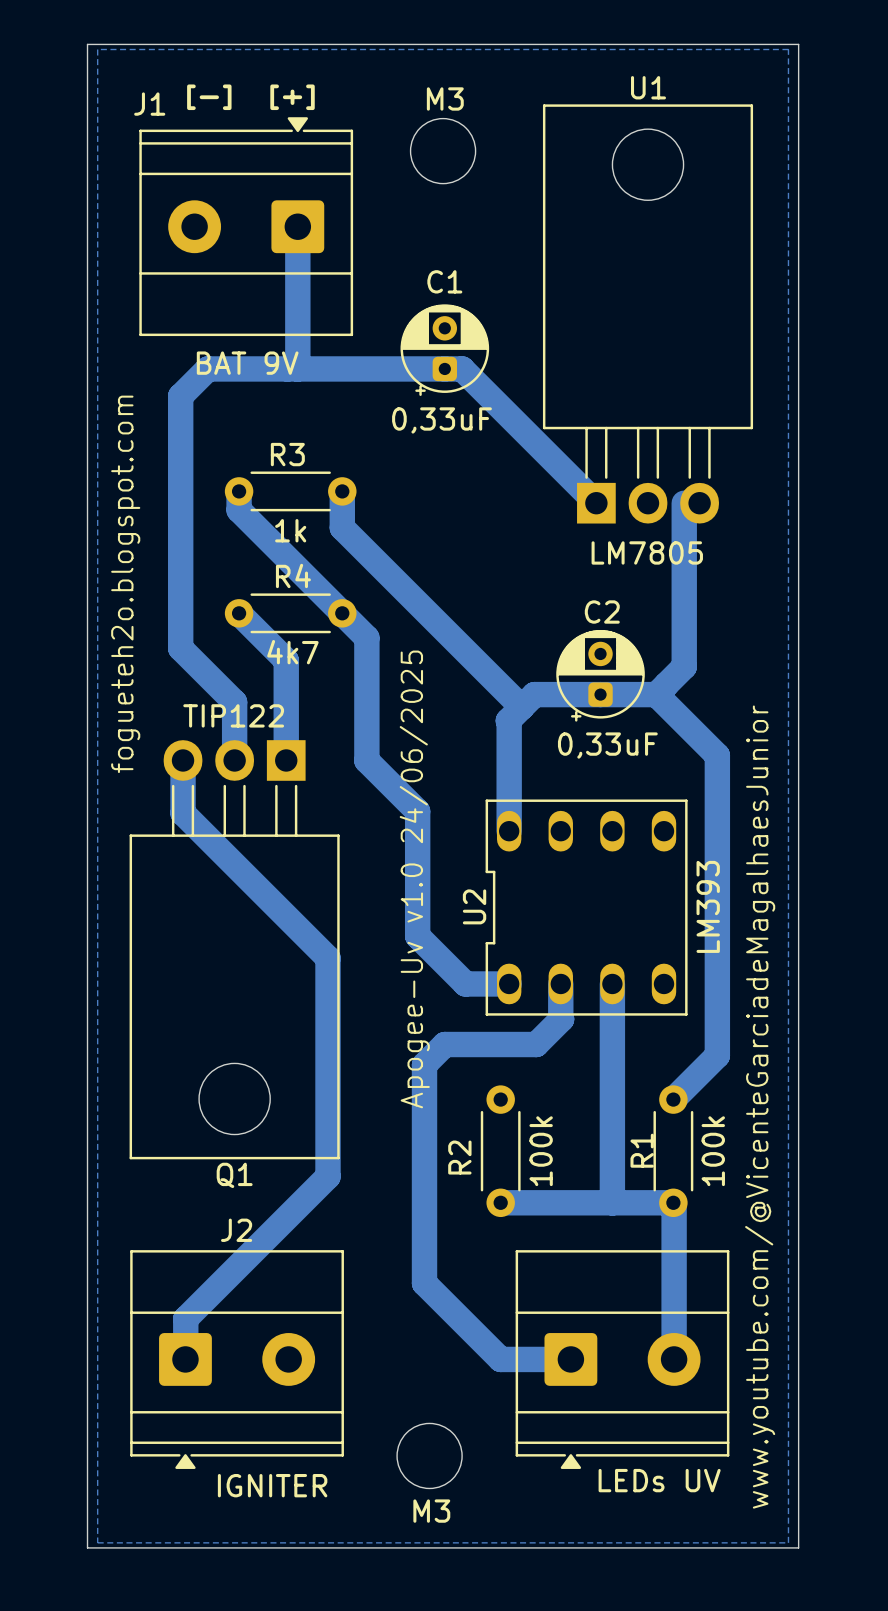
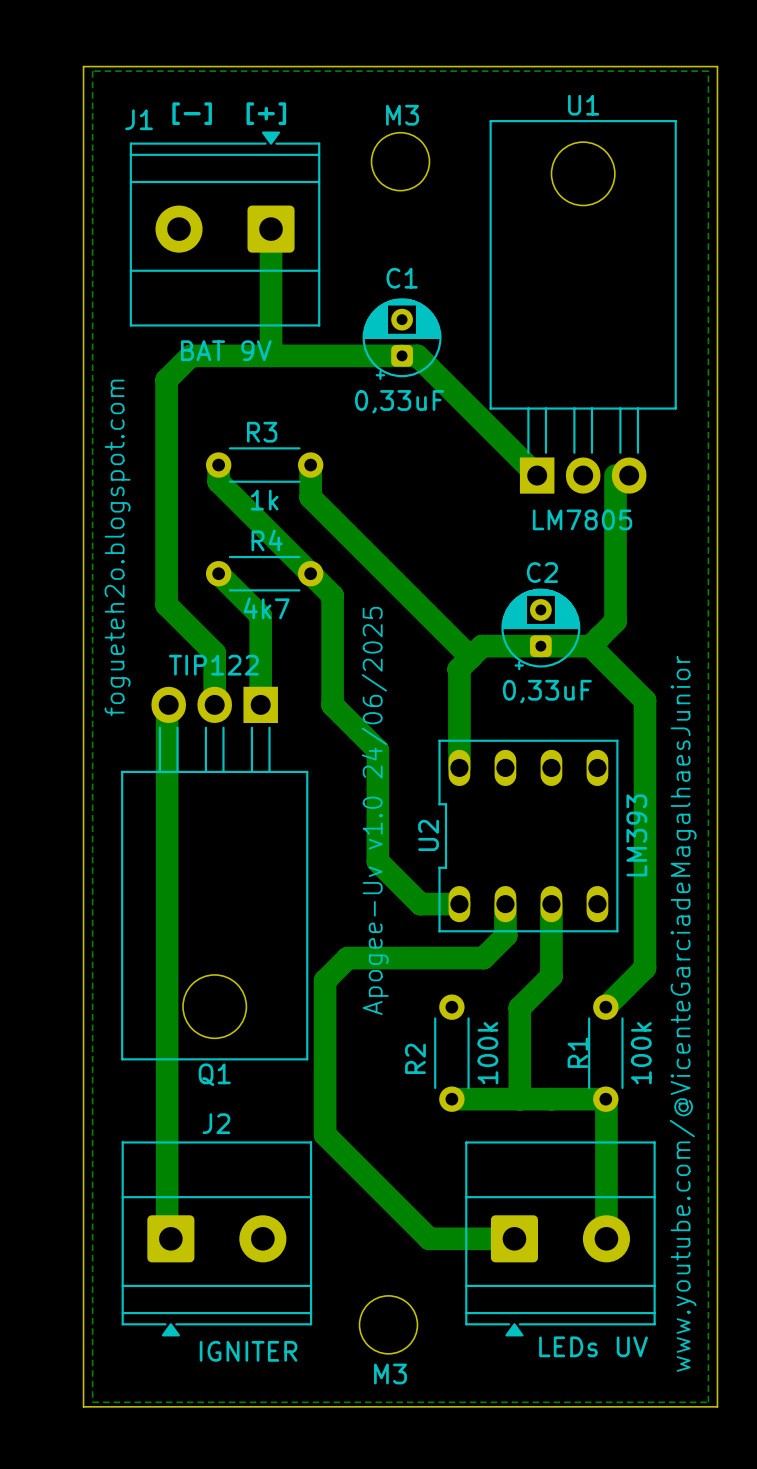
bottom track: (183, 760) (183, 813) (327, 958) (327, 1176) (185, 1318) (185, 1359) -> (168, 704) (167, 706) (167, 1235) (170, 1238)
bottom track: (444, 1044) (424, 1064) (424, 1283) (500, 1359) -> (402, 958) (347, 958) (325, 980) (325, 1134) (429, 1238) (451, 1238)
bottom track: (612, 1064) (612, 1202) -> (551, 976) (519, 1007) (519, 1099)

